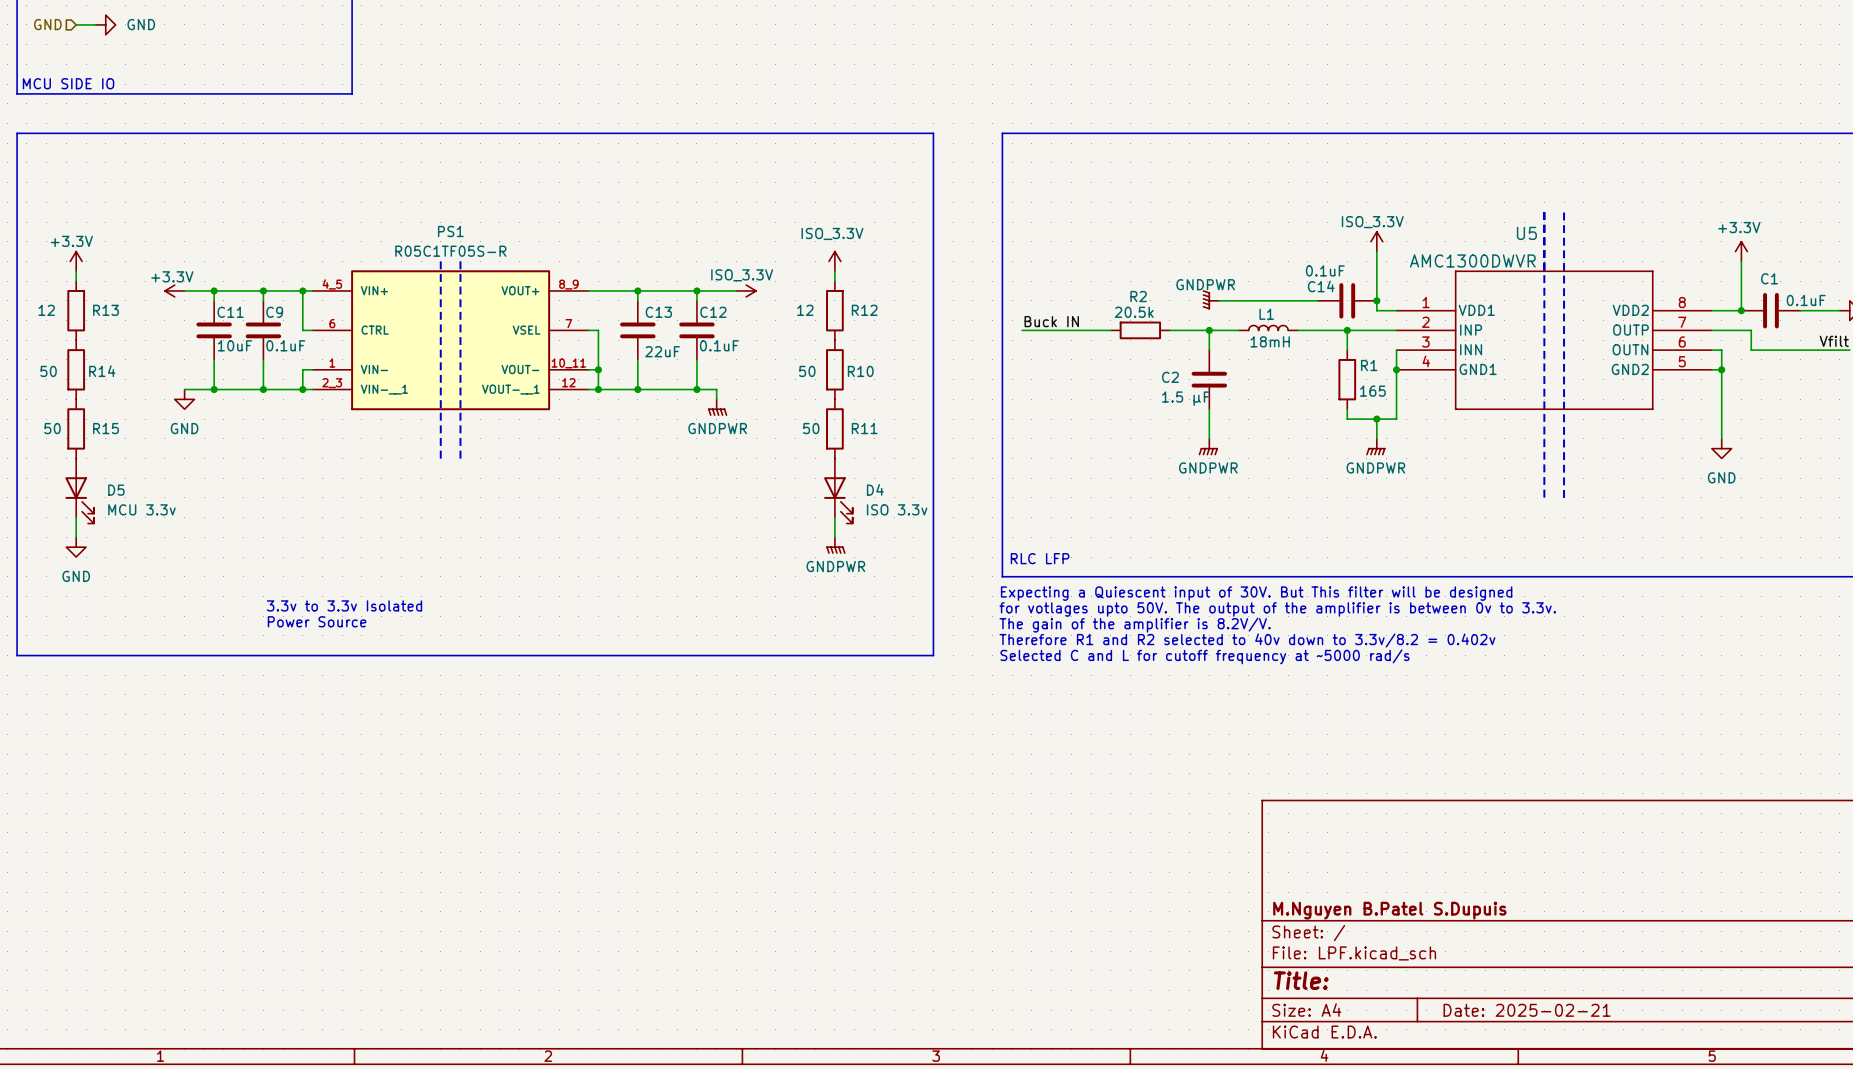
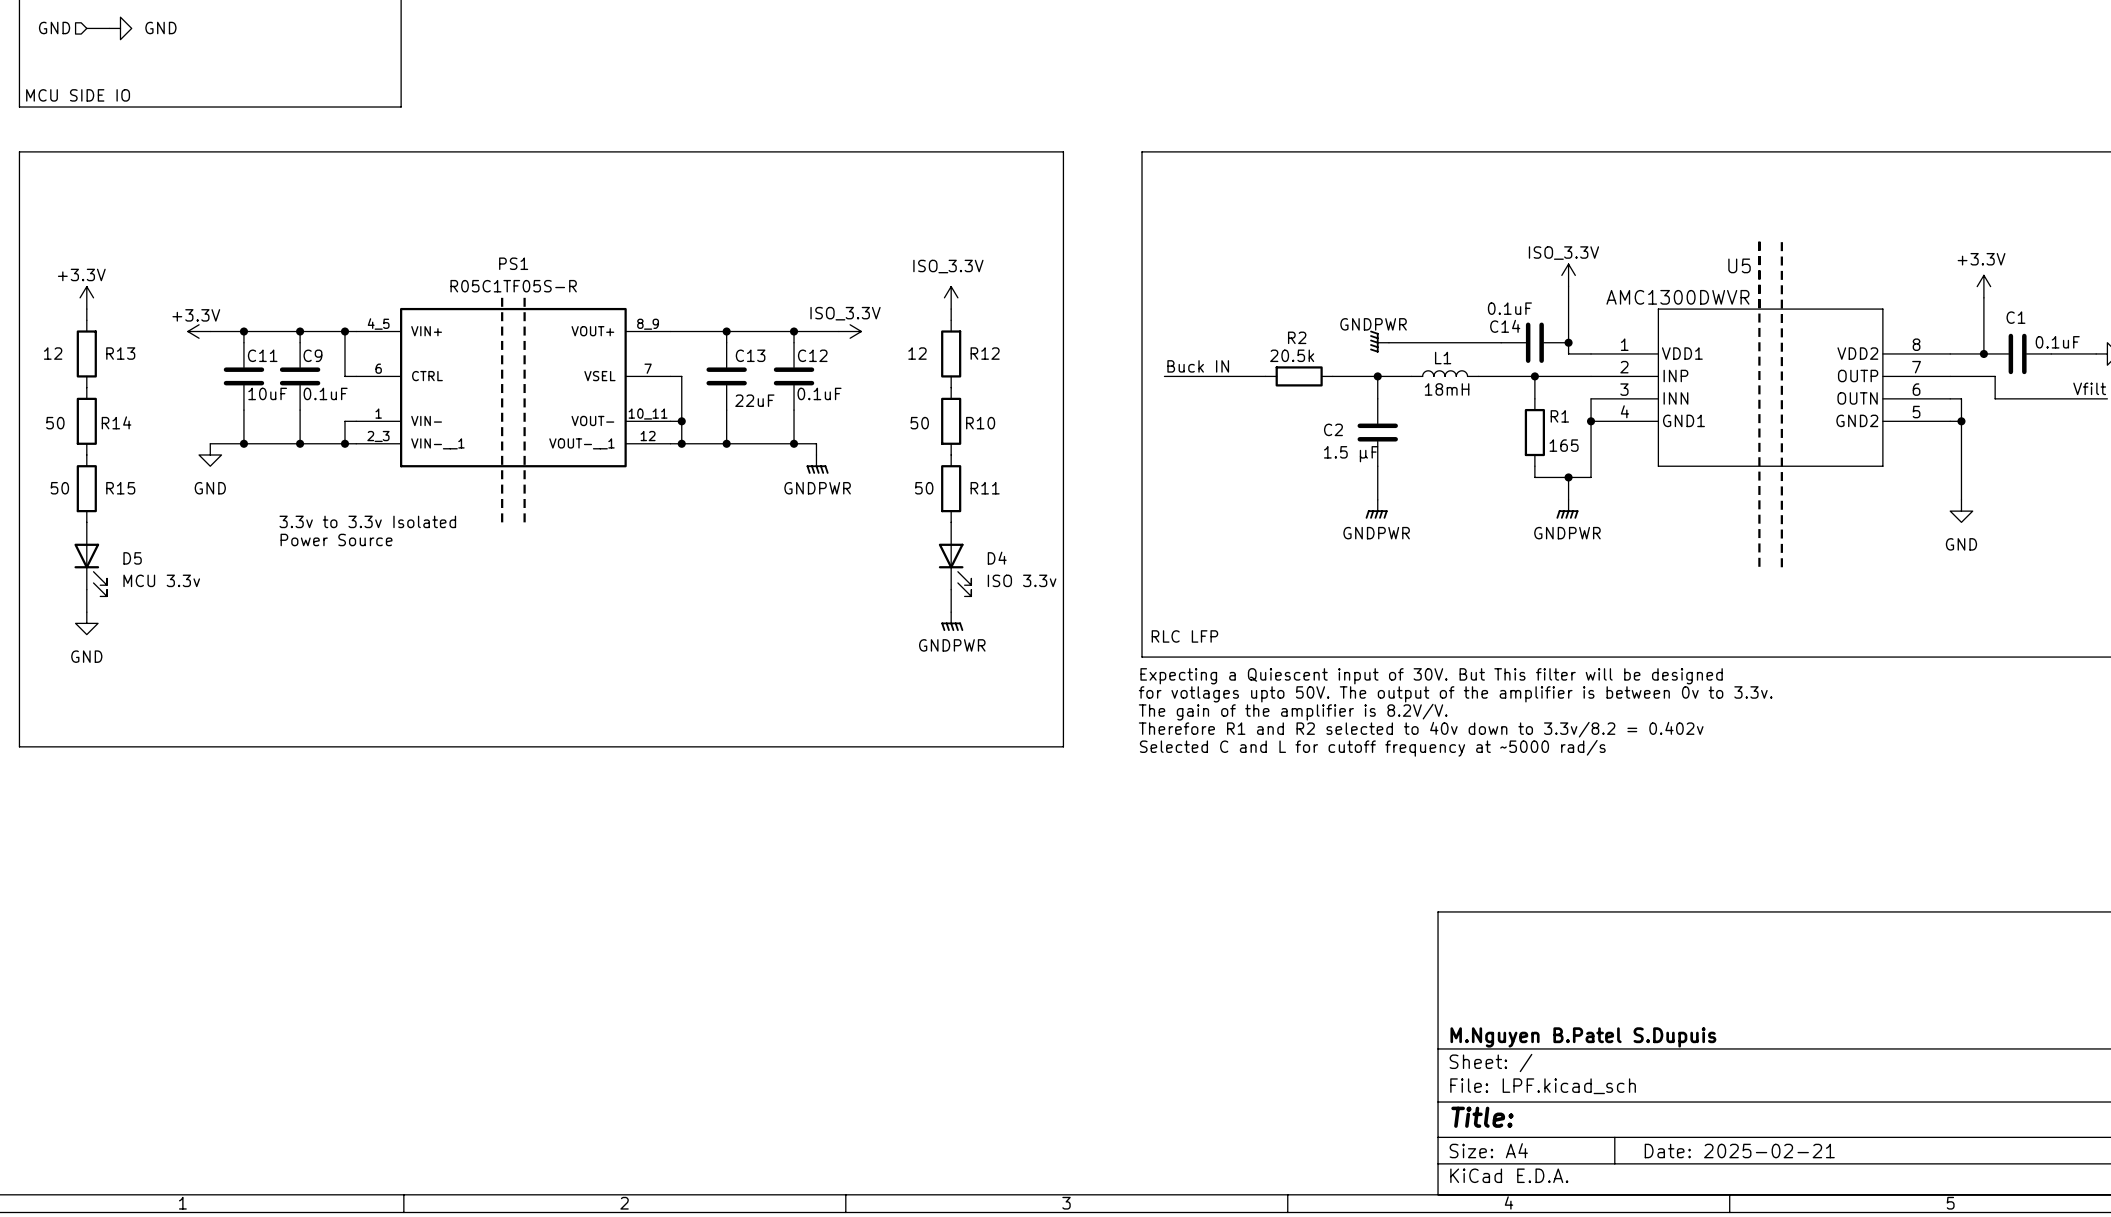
text position: 3.3v to 3.3v Isolated (344, 605) -> 3.3v to 3.3v Isolated (367, 521)
text position: Power Source (317, 621) -> Power Source (336, 539)

